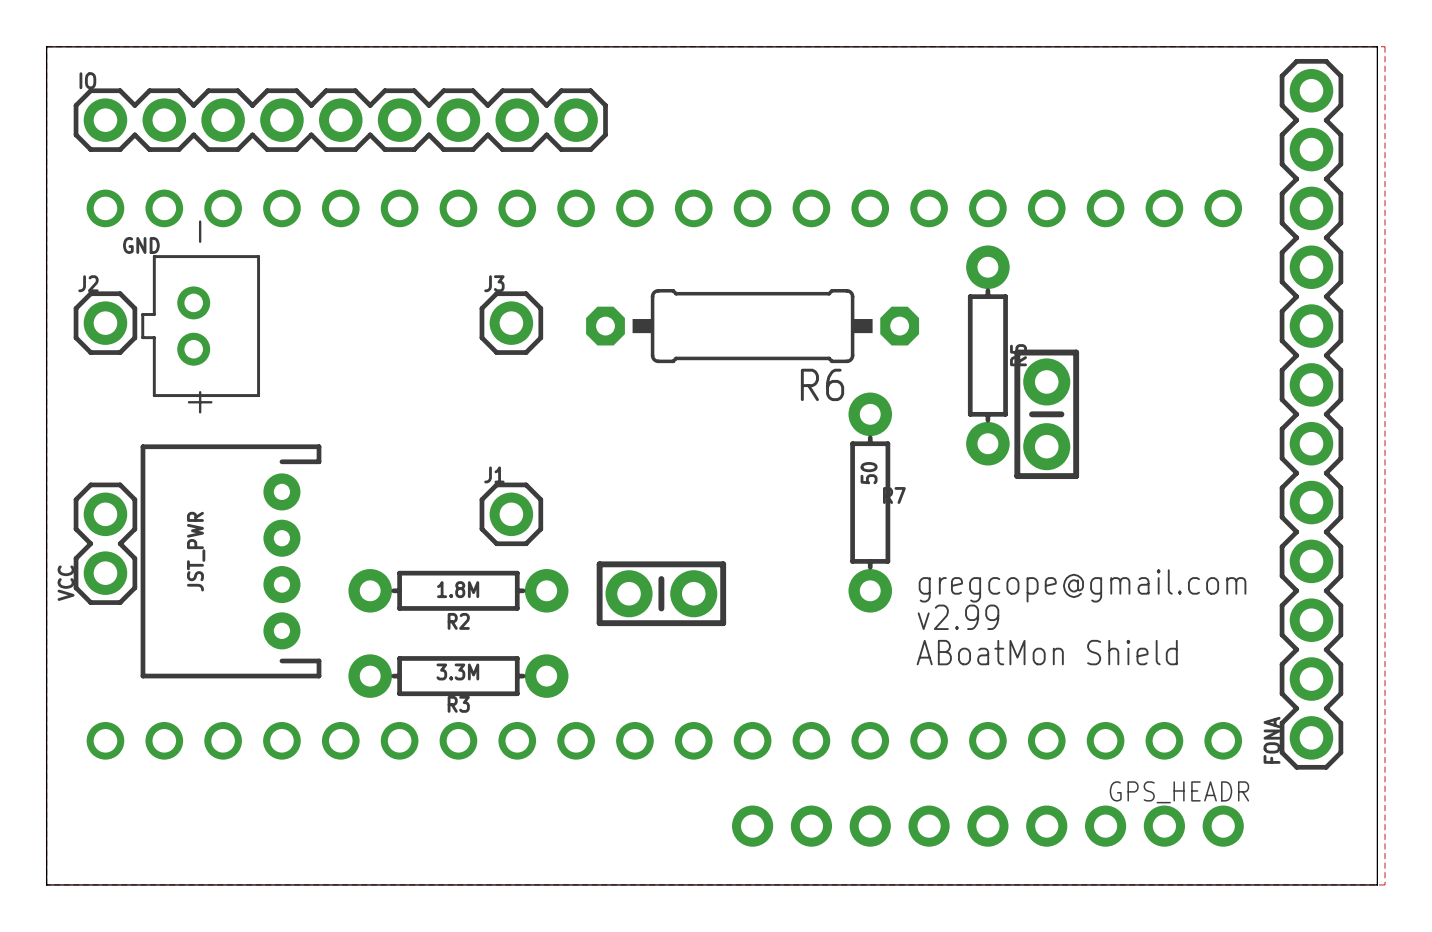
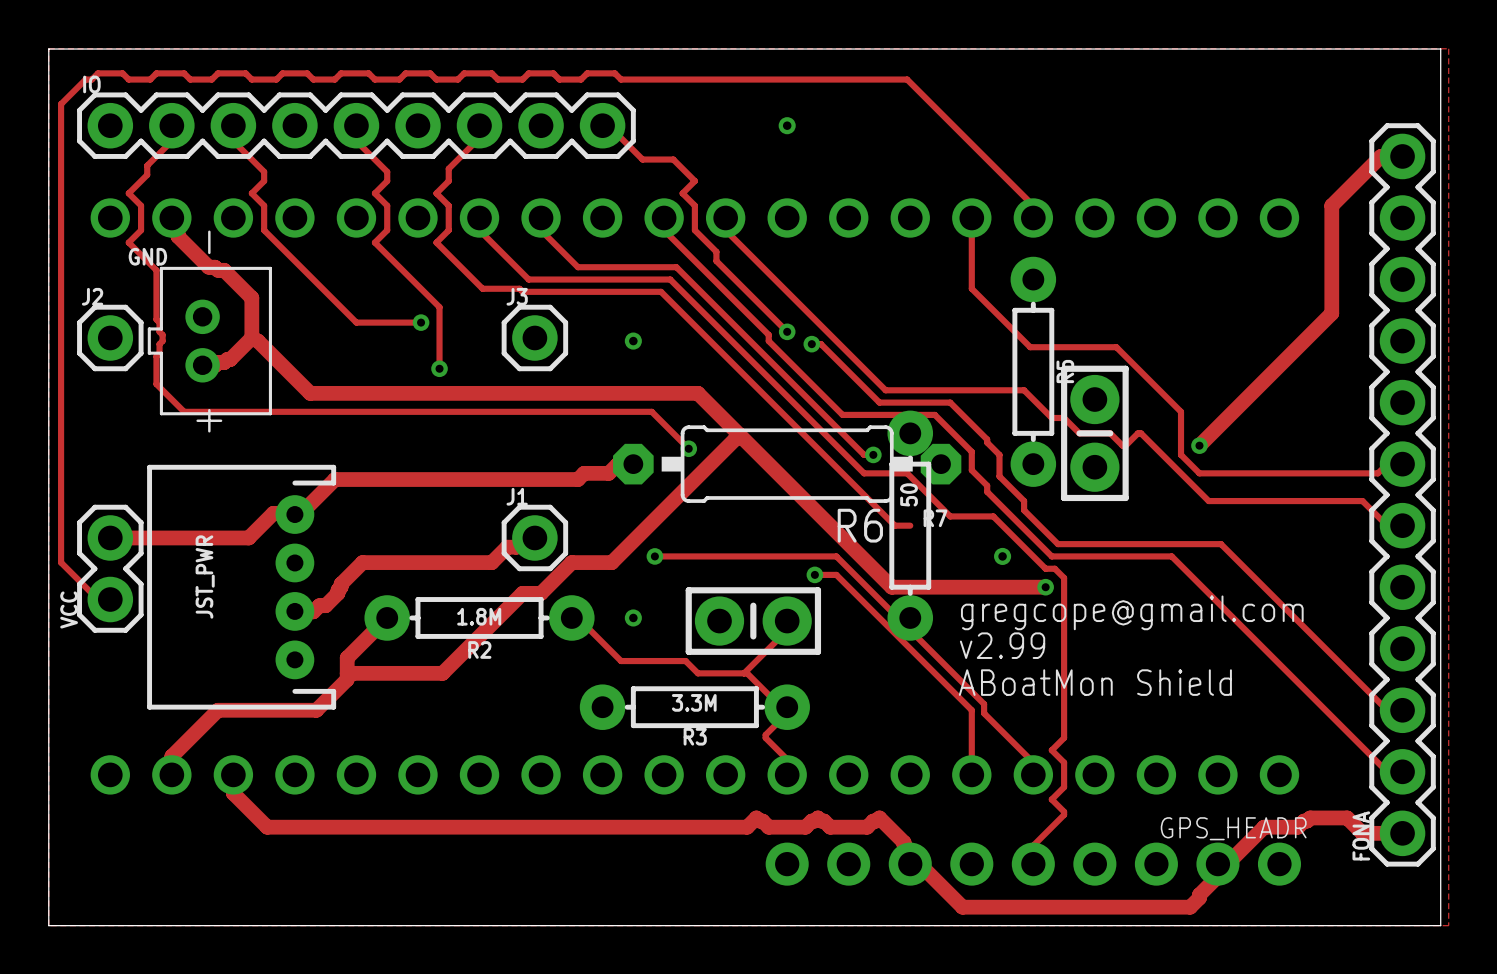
track: none -> (171, 125) (171, 141) (147, 165) (147, 174) (128, 193) (141, 205) (141, 230) (128, 242) (156, 270) (156, 319) (159, 322) (159, 331) (162, 334) (162, 341) (159, 344) (159, 353) (156, 356) (156, 384) (184, 411) (651, 411) (688, 448)
track: none -> (233, 125) (233, 141) (264, 171) (264, 181) (251, 193) (264, 205) (264, 230) (356, 322) (421, 322)
track: none -> (356, 125) (356, 141) (387, 171) (387, 181) (374, 193) (387, 205) (387, 230) (374, 242) (439, 307) (439, 368)
track: none -> (479, 125) (479, 138) (448, 168) (448, 181) (436, 193) (448, 205) (448, 230) (436, 242) (482, 288) (519, 288) (522, 291) (661, 291) (894, 525) (910, 525)
track: none -> (602, 125) (608, 125) (642, 159) (673, 159) (694, 181) (682, 193) (694, 205) (694, 230) (716, 251) (716, 261) (787, 331)
via: none -> (787, 125)
track: none -> (1402, 156) (1381, 156) (1331, 205) (1331, 313) (1199, 445)
track: none -> (171, 217) (171, 227) (177, 233) (177, 236) (208, 267) (224, 270) (251, 297) (251, 337)
track: none -> (479, 217) (479, 230) (528, 279) (670, 279) (864, 473) (907, 473) (950, 516) (993, 516) (1045, 568) (1054, 568) (1064, 577) (1064, 737) (1051, 750) (1064, 762) (1064, 787) (1051, 799) (1064, 811) (1064, 814) (1033, 845) (1033, 864)
track: none -> (541, 217) (541, 230) (577, 267) (676, 267) (864, 454) (873, 454)
track: none -> (664, 217) (664, 230) (768, 334) (768, 341) (842, 414) (934, 414) (971, 451) (971, 470) (987, 485) (987, 491) (1051, 556) (1171, 556) (1387, 771) (1402, 771)
track: none -> (725, 217) (725, 230) (885, 390) (1024, 390) (1051, 417) (1064, 417) (1079, 433) (1110, 433) (1122, 445) (1125, 445) (1137, 433) (1141, 433) (1208, 501) (1362, 501) (1387, 525) (1402, 525)
track: none -> (971, 217) (971, 288) (1030, 347) (1116, 347) (1181, 411) (1181, 454) (1199, 473) (1377, 473) (1387, 464) (1402, 464)
track: none -> (1033, 217) (1033, 205) (907, 79) (621, 79) (614, 73) (587, 73) (581, 79) (559, 79) (553, 73) (528, 73) (522, 79) (497, 79) (491, 73) (464, 73) (457, 79) (436, 79) (430, 73) (405, 73) (399, 79) (374, 79) (368, 73) (341, 73) (334, 79) (313, 79) (307, 73) (282, 73) (276, 79) (251, 79) (245, 73) (217, 73) (211, 79) (190, 79) (184, 73) (156, 73) (150, 79) (128, 79) (122, 73) (98, 73) (91, 79) (85, 79) (61, 104) (61, 562) (98, 599) (110, 599)
via: none -> (421, 322)
via: none -> (787, 331)
track: none -> (251, 337) (230, 359) (217, 362) (214, 365) (202, 365)
track: none -> (251, 337) (257, 341) (310, 393) (697, 393) (891, 587) (1045, 587)
via: none -> (633, 341)
R6 position: (752, 326) -> (787, 464)
track: none -> (811, 344) (821, 344) (879, 402) (950, 402) (987, 439) (987, 442) (999, 454) (999, 476) (1024, 501) (1024, 510) (1057, 544) (1221, 544) (1387, 710) (1402, 710)
via: none -> (811, 344)
via: none -> (439, 368)
FONA position: (1311, 414) -> (1402, 494)
track: none -> (739, 434) (611, 562) (571, 562) (541, 593) (522, 593) (442, 673) (347, 673)
via: none -> (1199, 445)
via: none -> (688, 448)
via: none -> (873, 454)
track: none -> (633, 464) (617, 464) (608, 473) (584, 473) (577, 479) (334, 479) (301, 513) (273, 513) (248, 537) (110, 537)
track: none -> (534, 537) (525, 537) (516, 547) (507, 547) (491, 562) (362, 562) (341, 584) (337, 593) (325, 605) (319, 605) (313, 611) (294, 611)
track: none -> (654, 556) (836, 556) (984, 704) (984, 713) (1033, 762) (1033, 774)
via: none -> (654, 556)
via: none -> (1002, 556)
track: none -> (814, 574) (836, 574) (971, 710) (971, 774)
via: none -> (814, 574)
via: none -> (1045, 587)
track: none -> (387, 617) (347, 657) (347, 679) (316, 710) (217, 710) (171, 756) (171, 774)
track: none -> (571, 617) (577, 617) (621, 661) (685, 661) (697, 673) (747, 673) (787, 713)
via: none -> (633, 617)
part position: (661, 593) -> (753, 621)
track: none -> (787, 621) (787, 630) (744, 673)
R3 position: (458, 676) -> (694, 707)
track: none -> (787, 713) (765, 734) (765, 737) (787, 759) (787, 774)
track: none -> (233, 774) (233, 793) (267, 827) (747, 827) (756, 817) (768, 827) (805, 827) (817, 817) (830, 827) (867, 827) (879, 817) (904, 842) (904, 845) (910, 851) (910, 864) (916, 861) (962, 907) (1190, 907) (1214, 879) (1214, 870) (1217, 864) (1227, 864) (1264, 827) (1297, 827) (1310, 817) (1347, 817) (1362, 833) (1402, 833)

